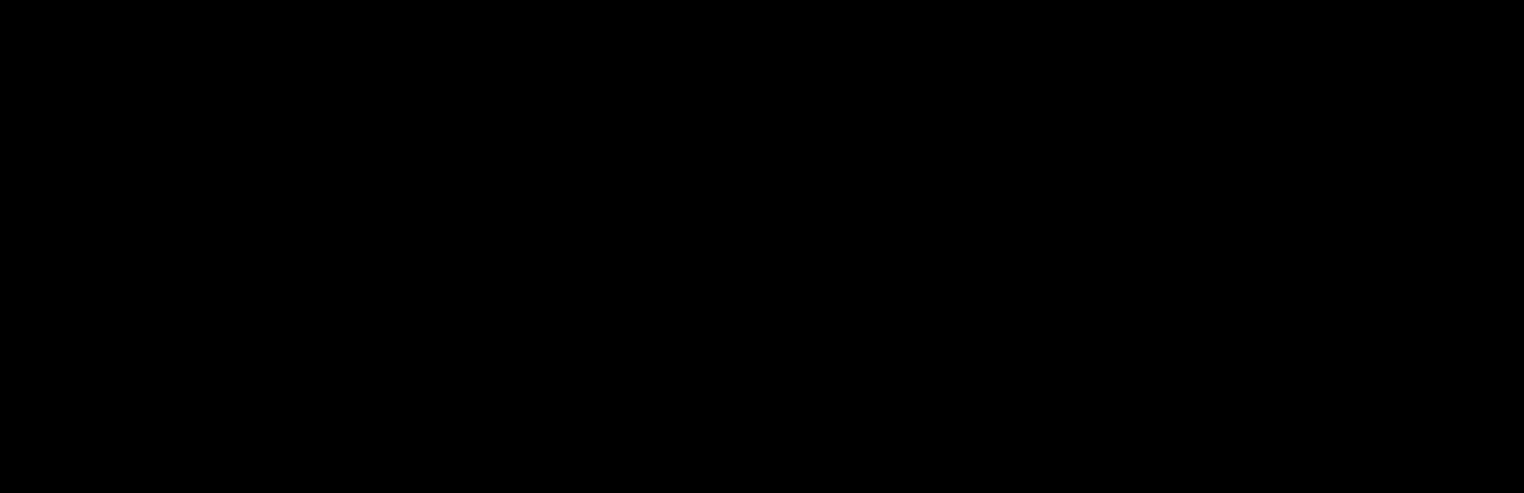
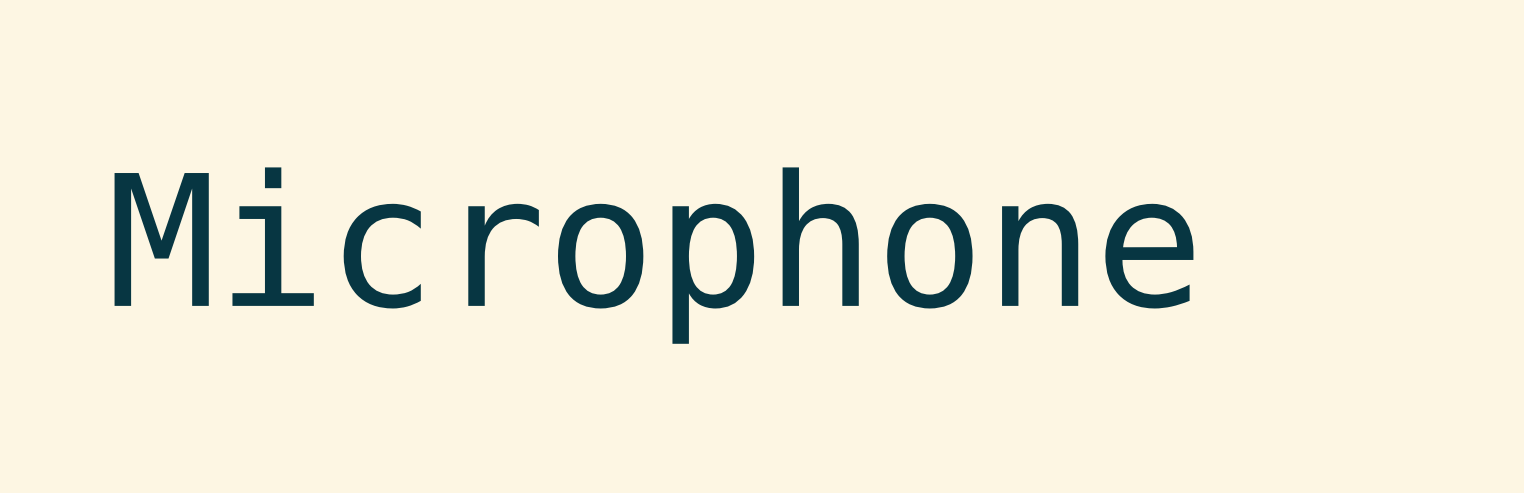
label: none -> Microphone (653, 255)

